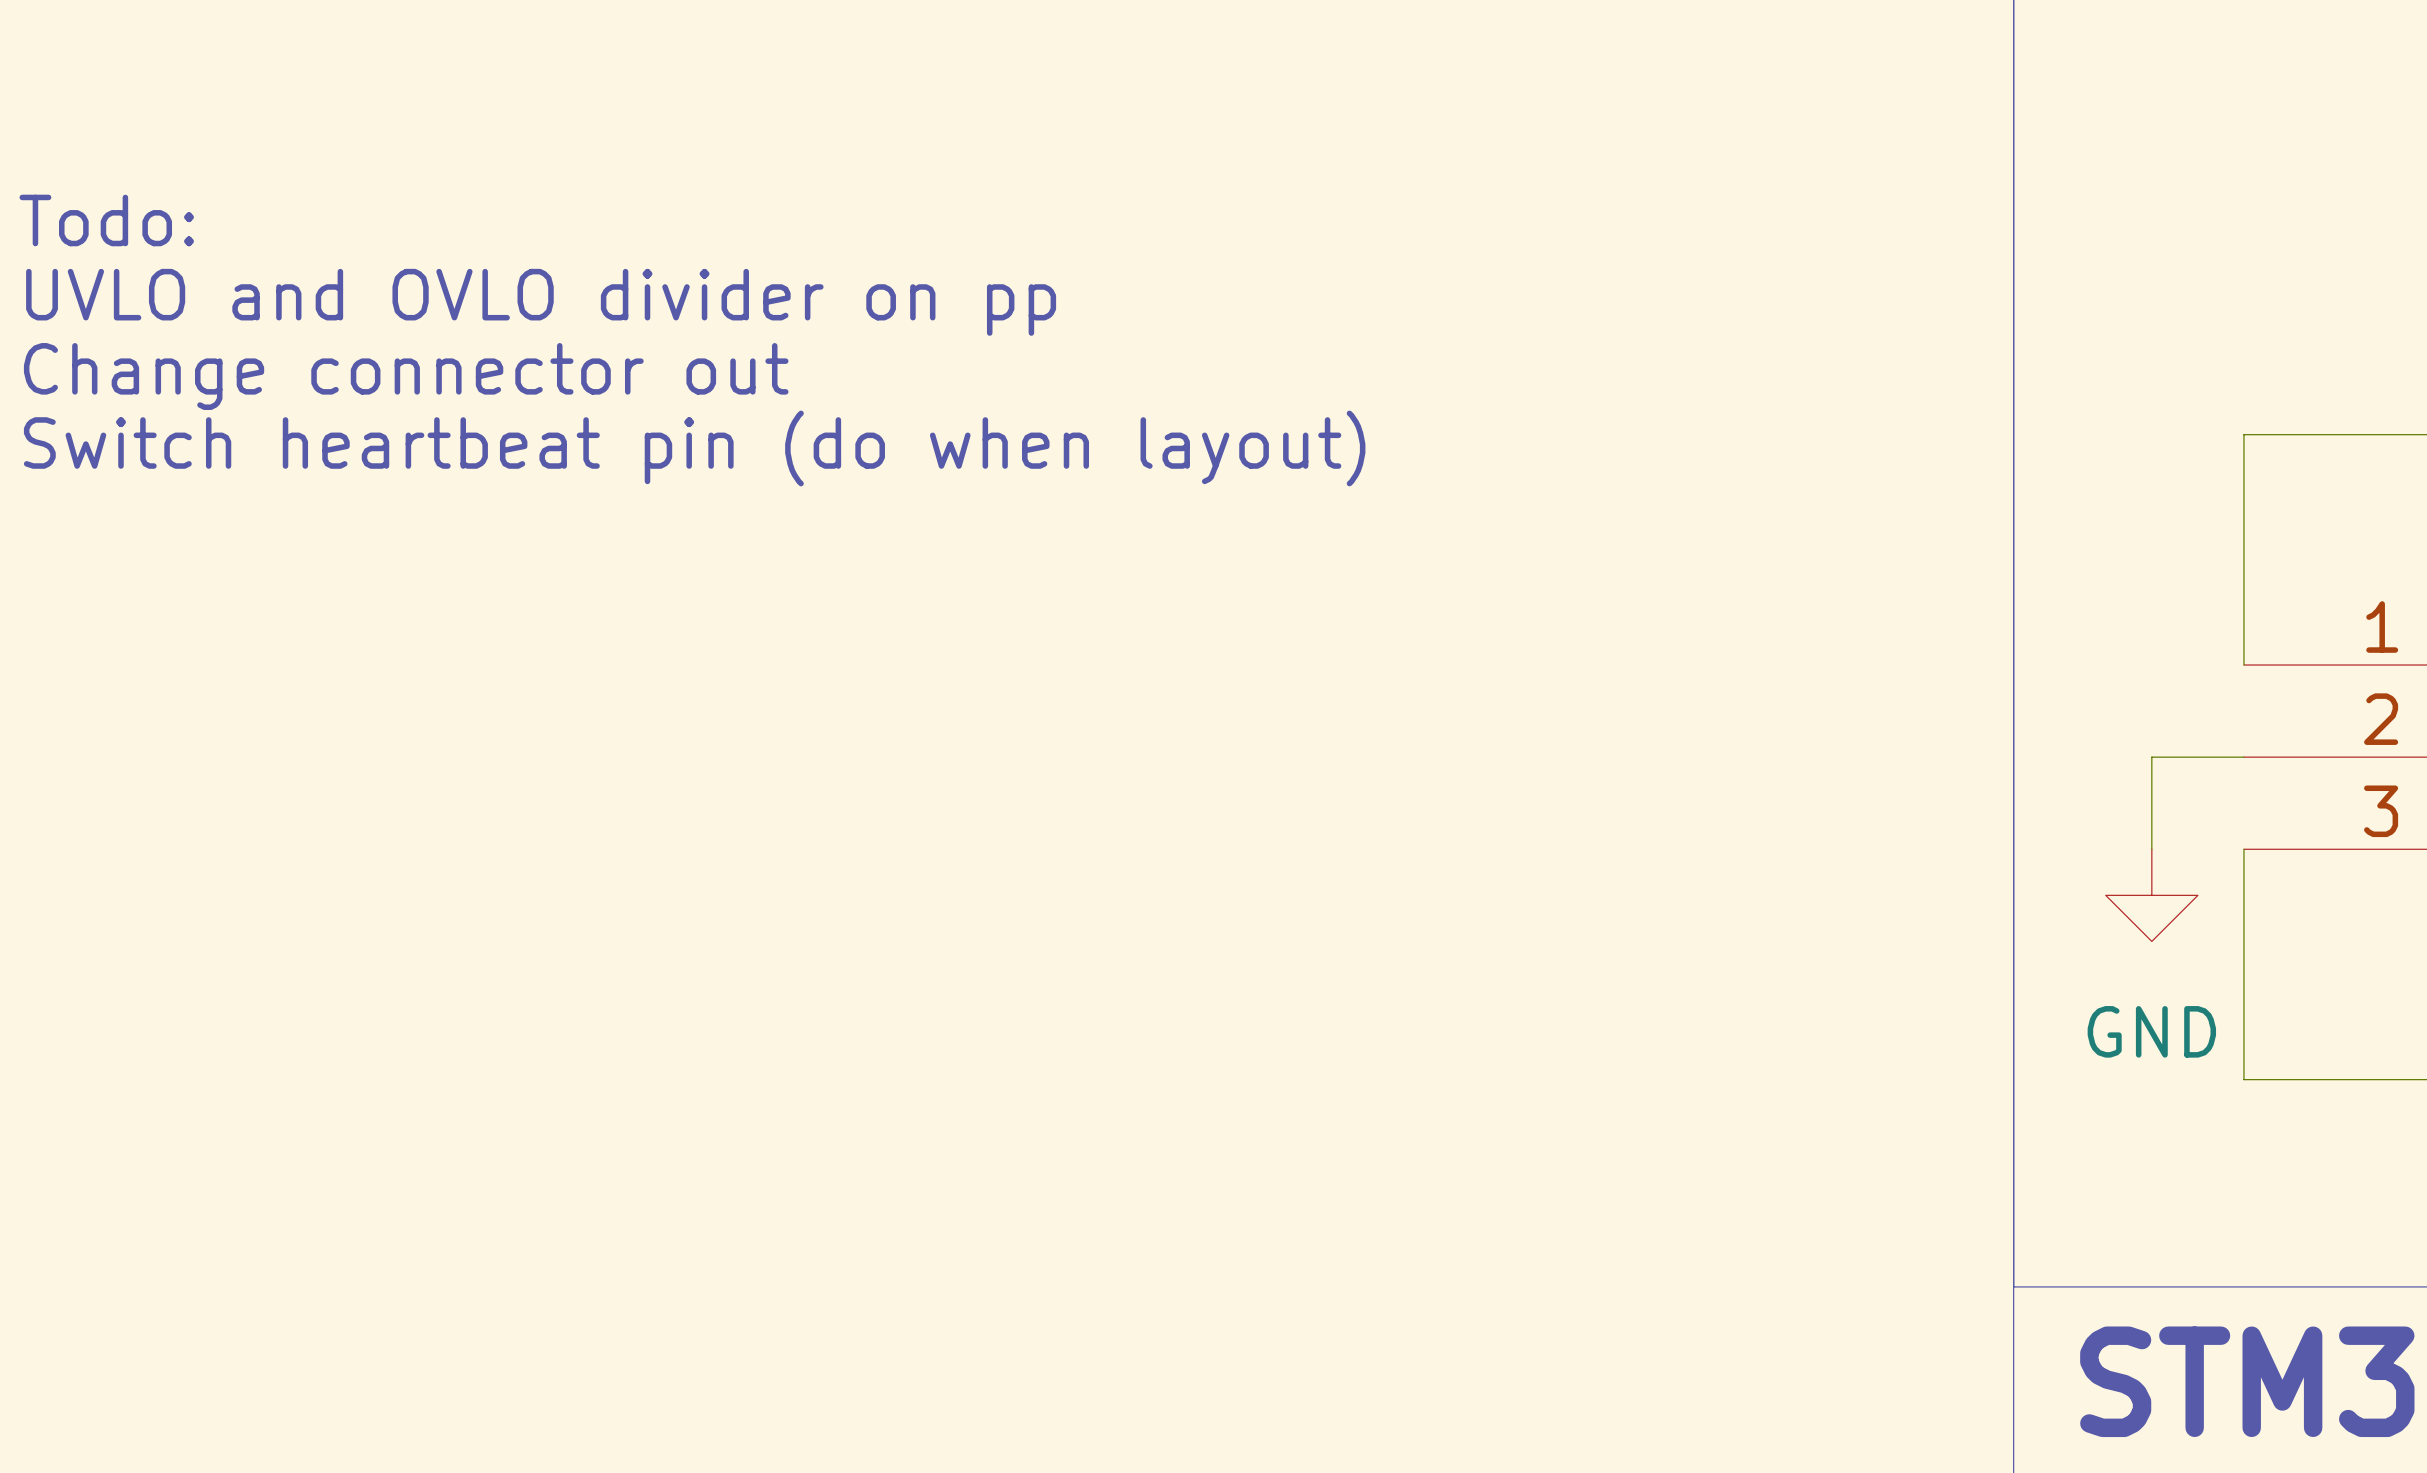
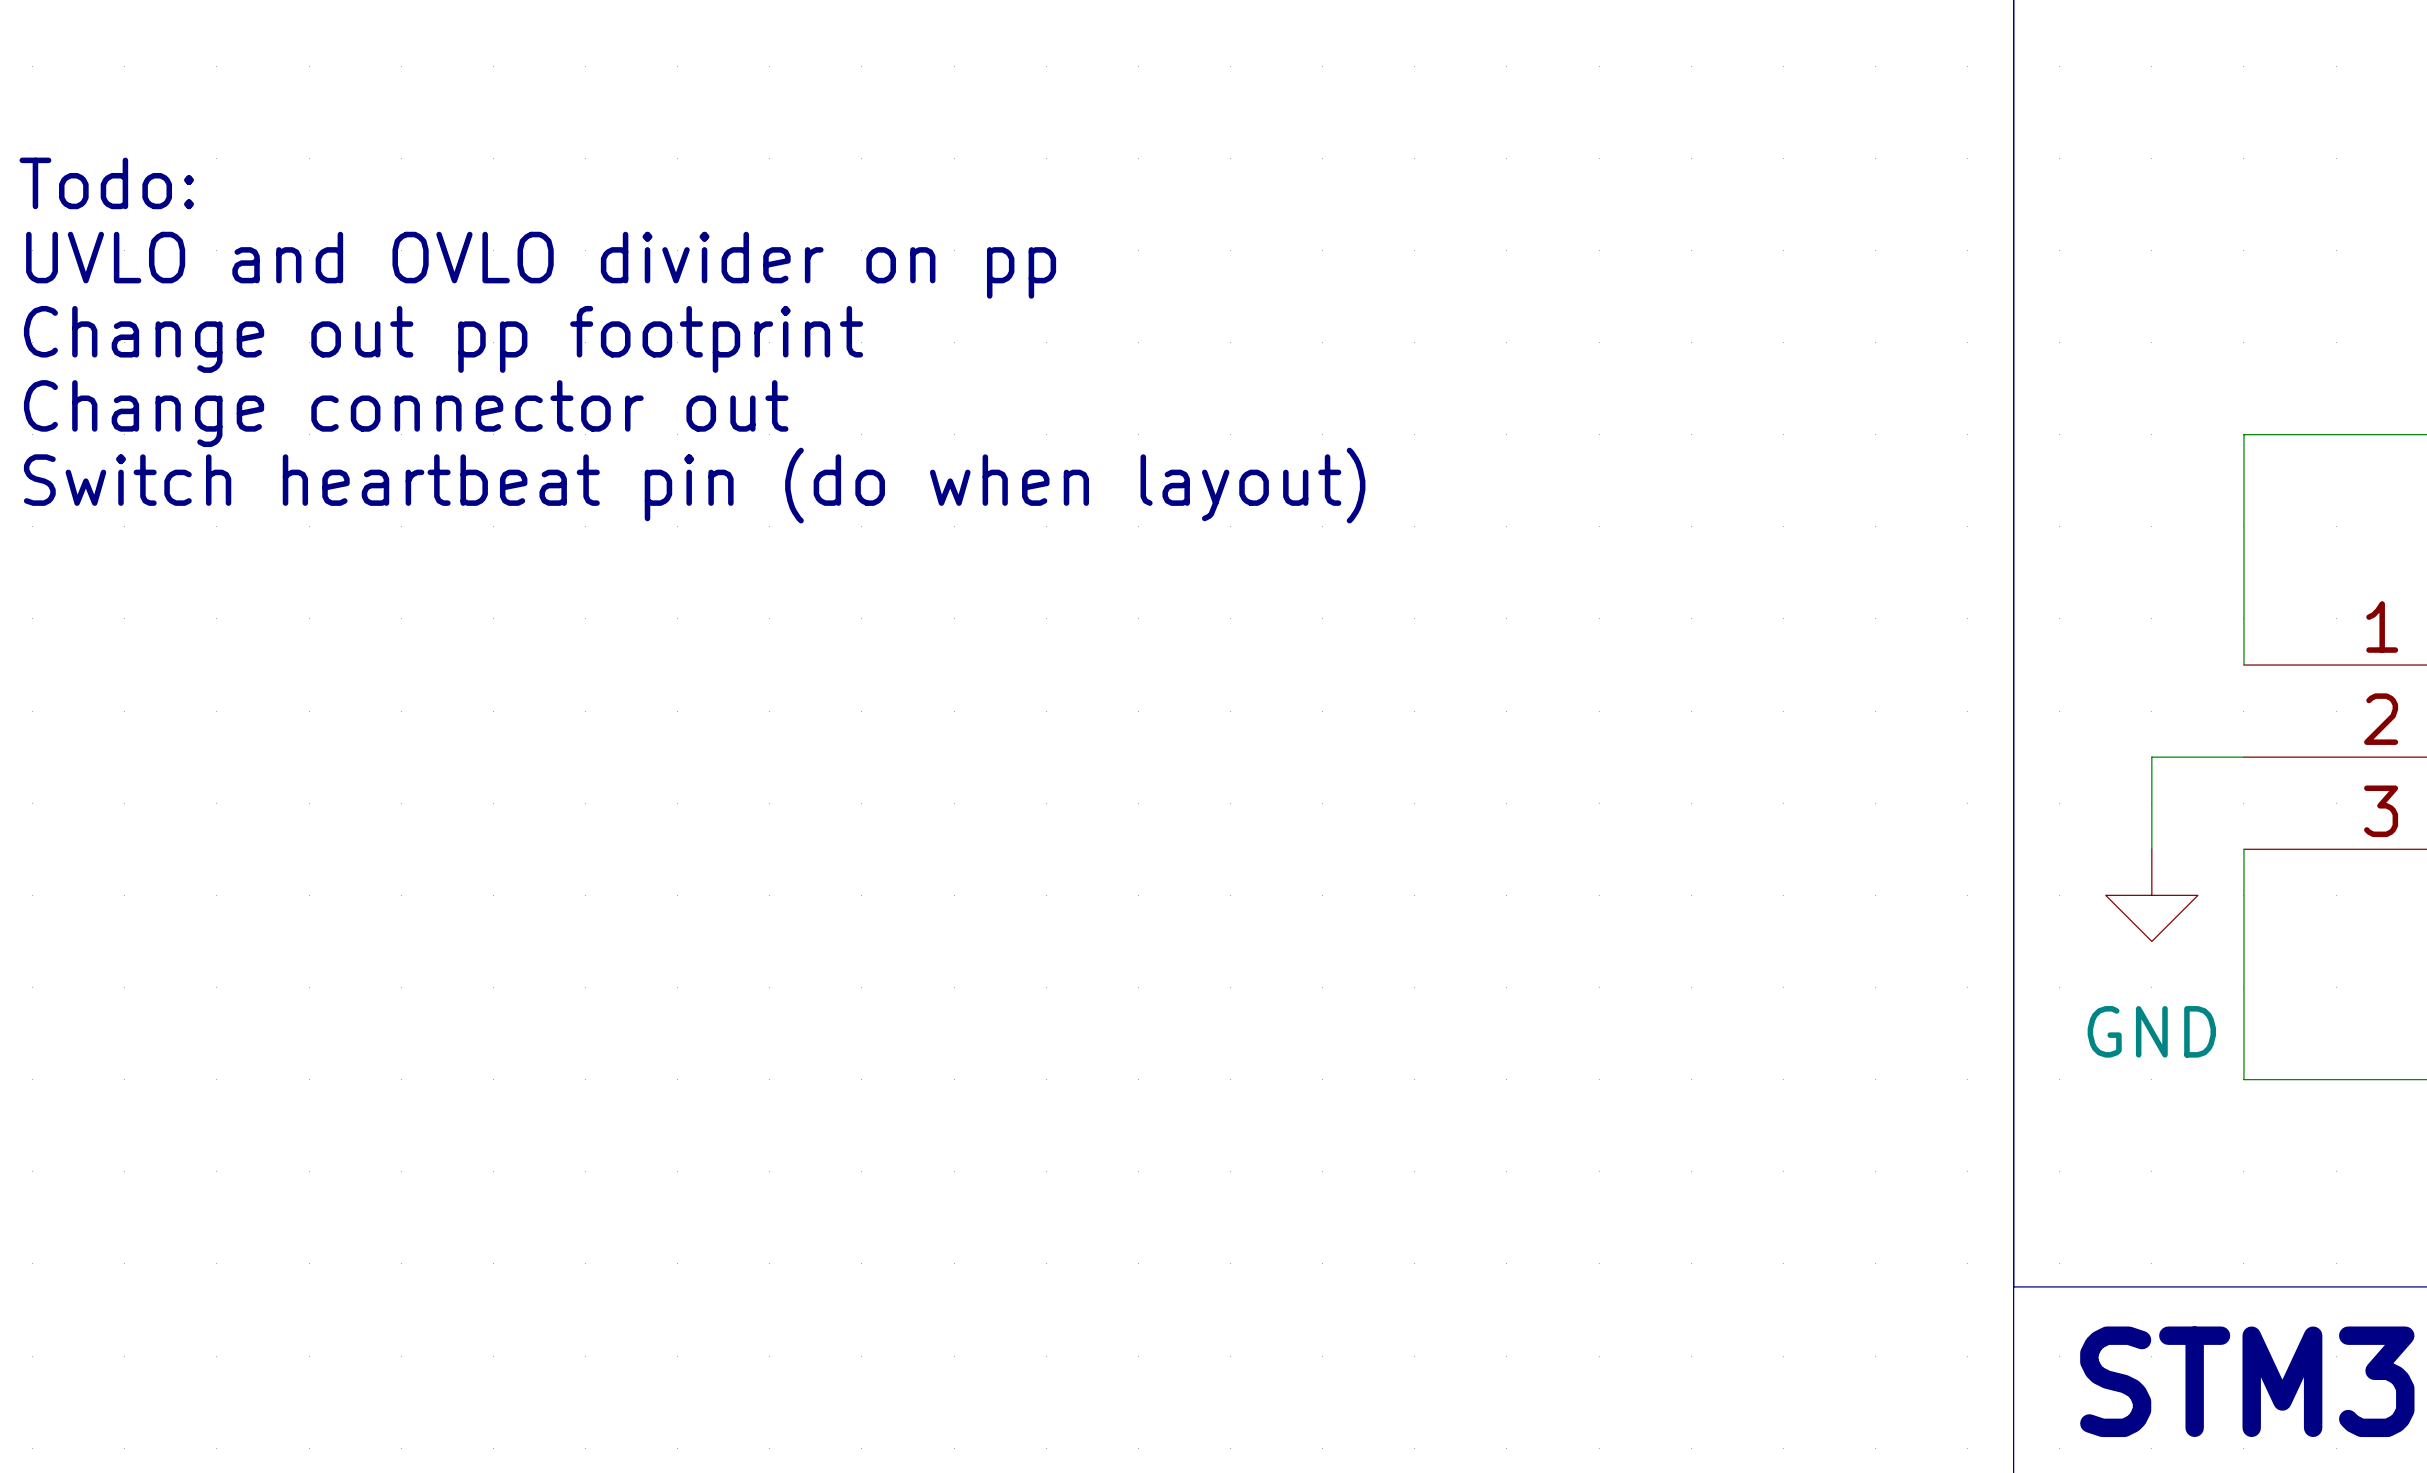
text position: Todo: (106, 220) -> Todo: (106, 183)
text position: UVLO and OVLO divider on pp (541, 302) -> UVLO and OVLO divider on pp (541, 265)
text: none -> Change out pp footprint (443, 339)
text position: Change connector out (406, 376) -> Change connector out (406, 413)
text position: Switch heartbeat pin (do when layout) (694, 448) -> Switch heartbeat pin (do when layout) (694, 485)

